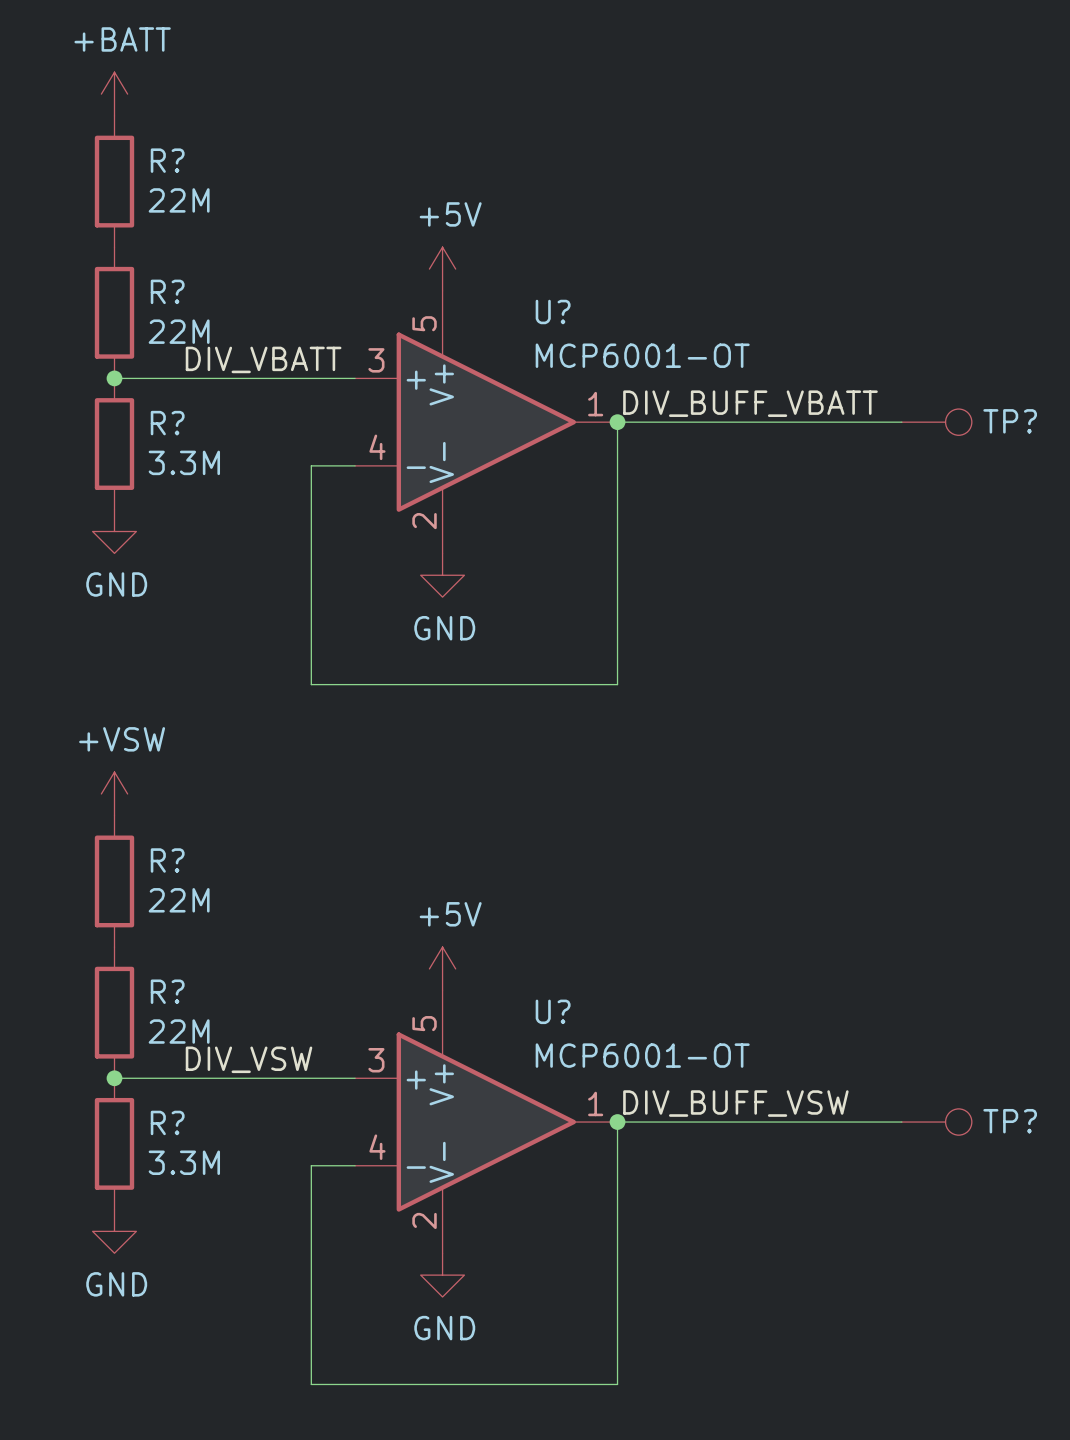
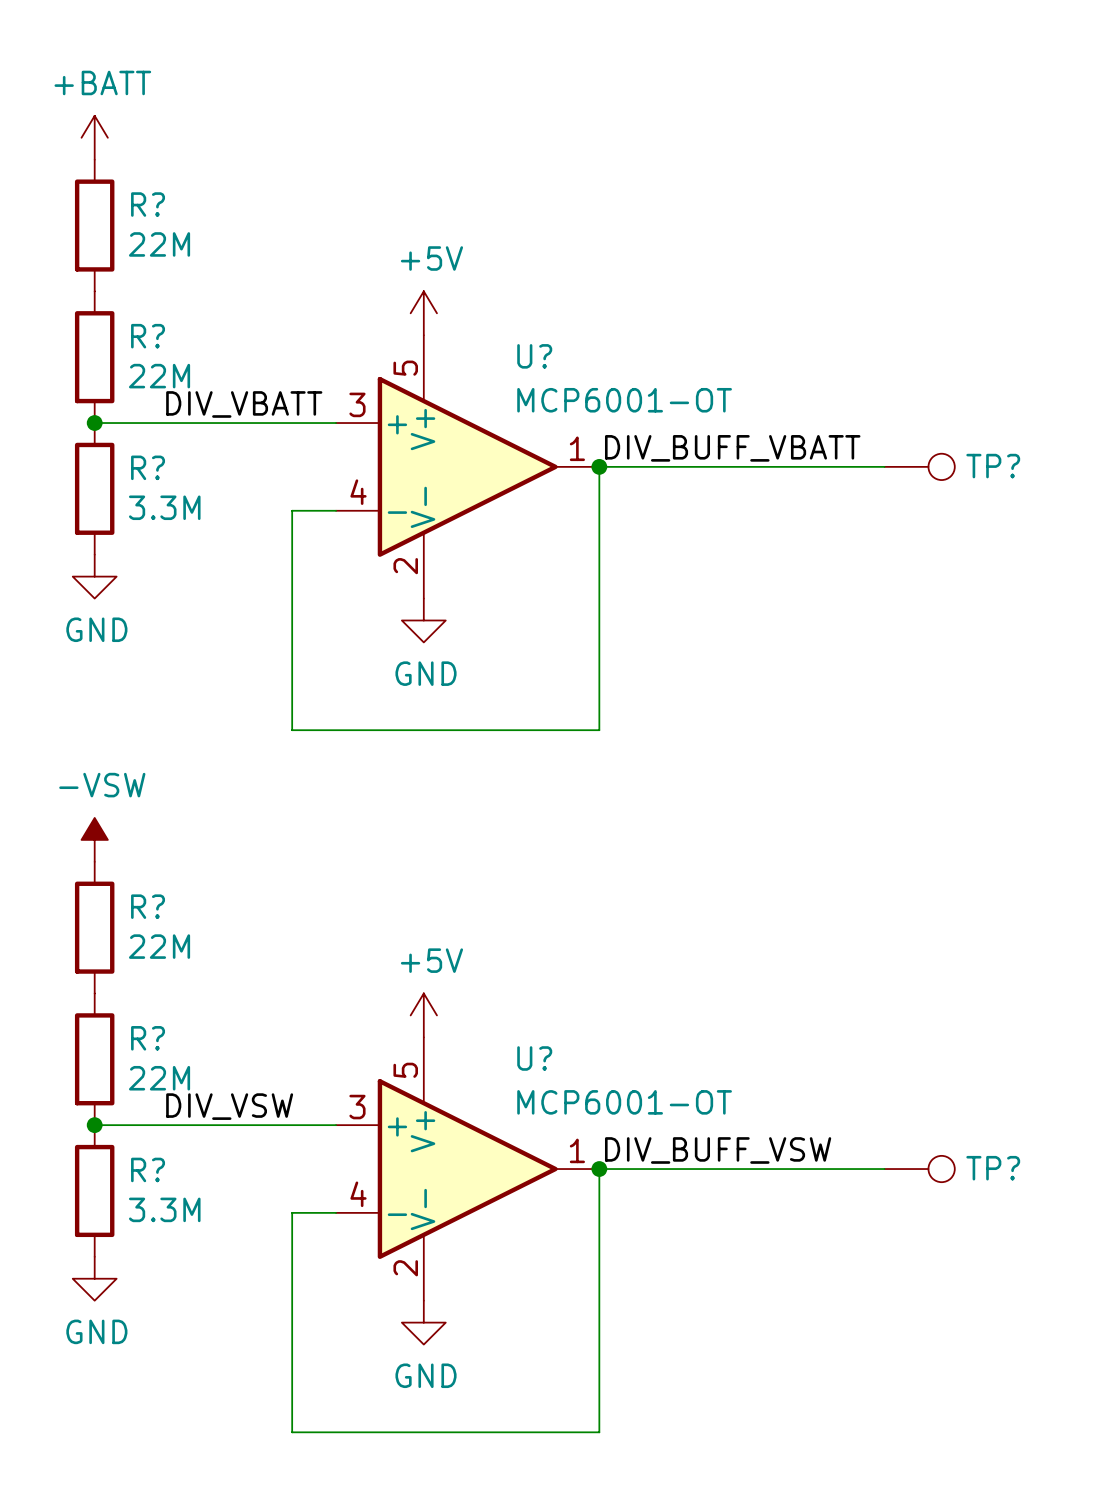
power symbol: +VSW (114, 793) -> -VSW (94, 839)

